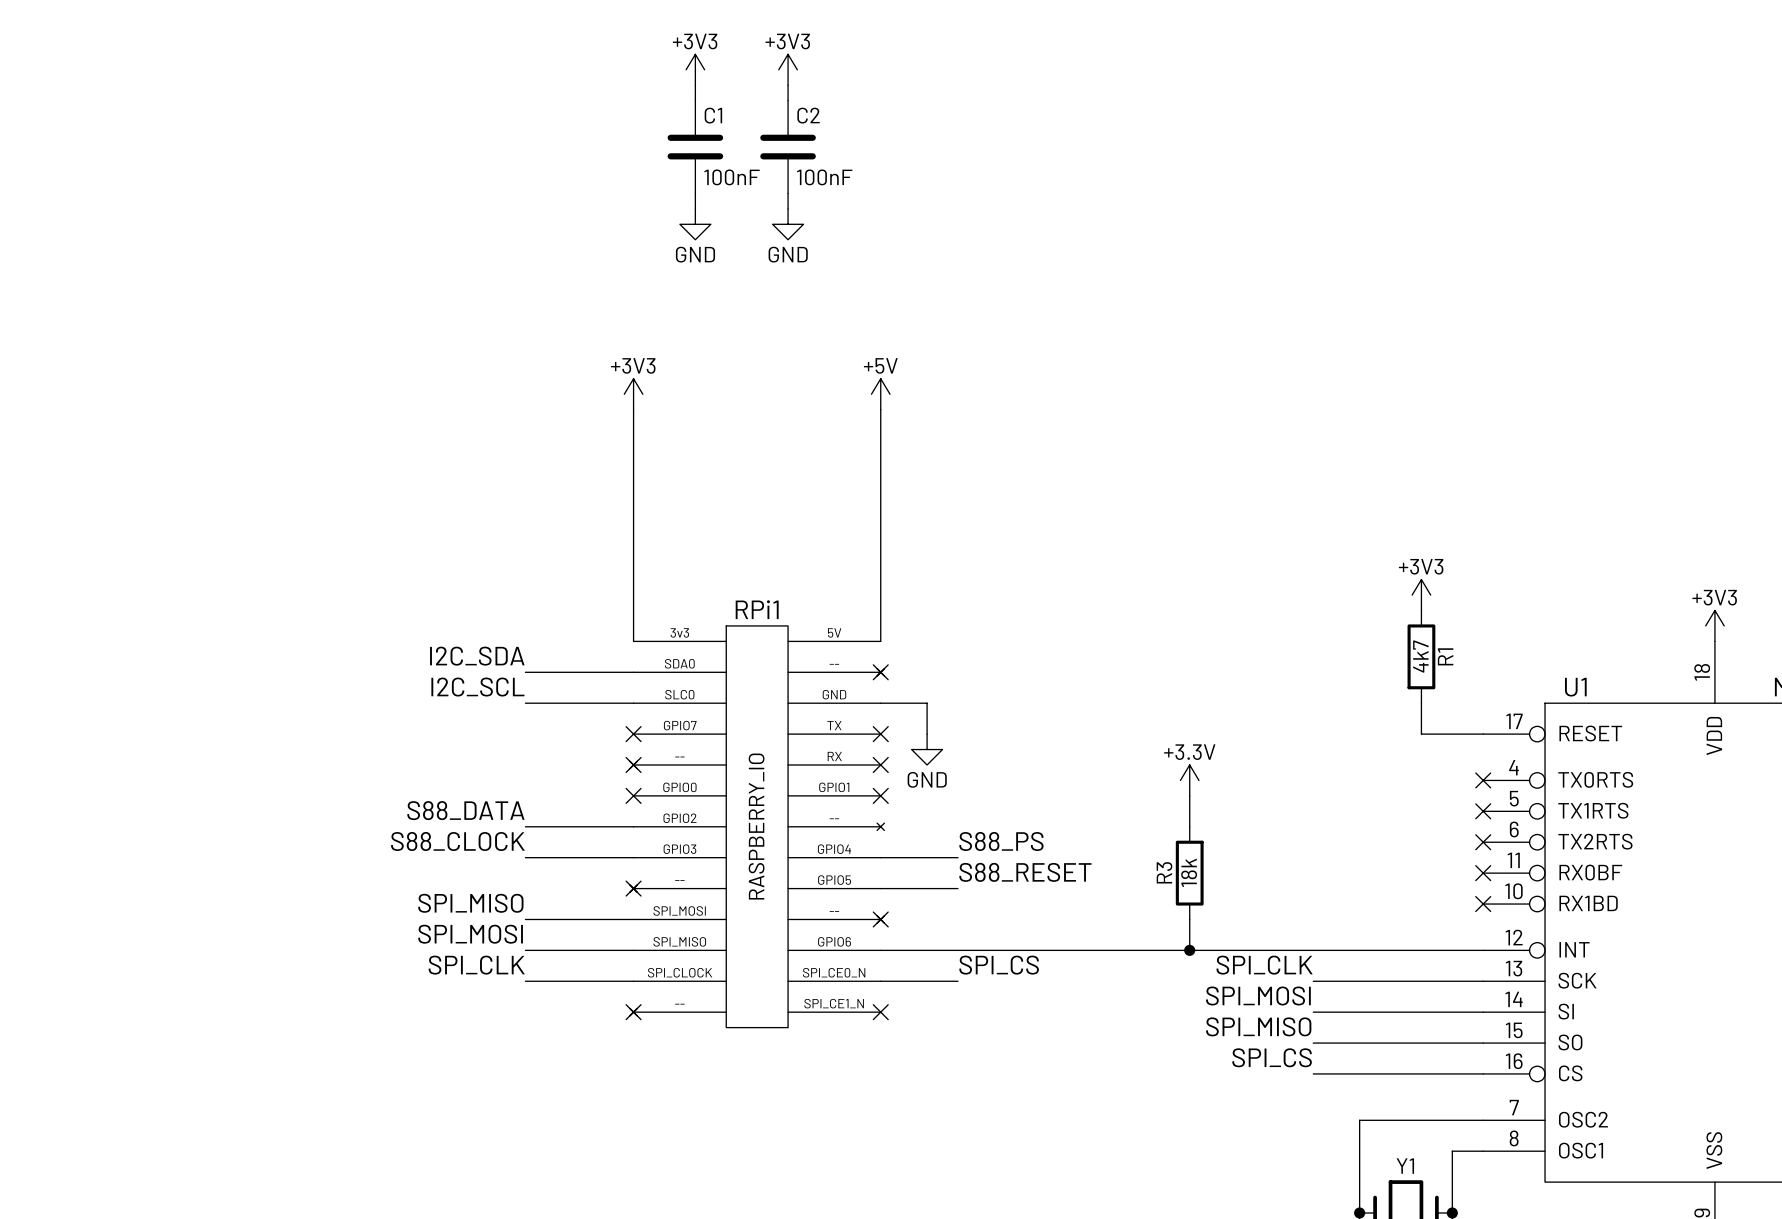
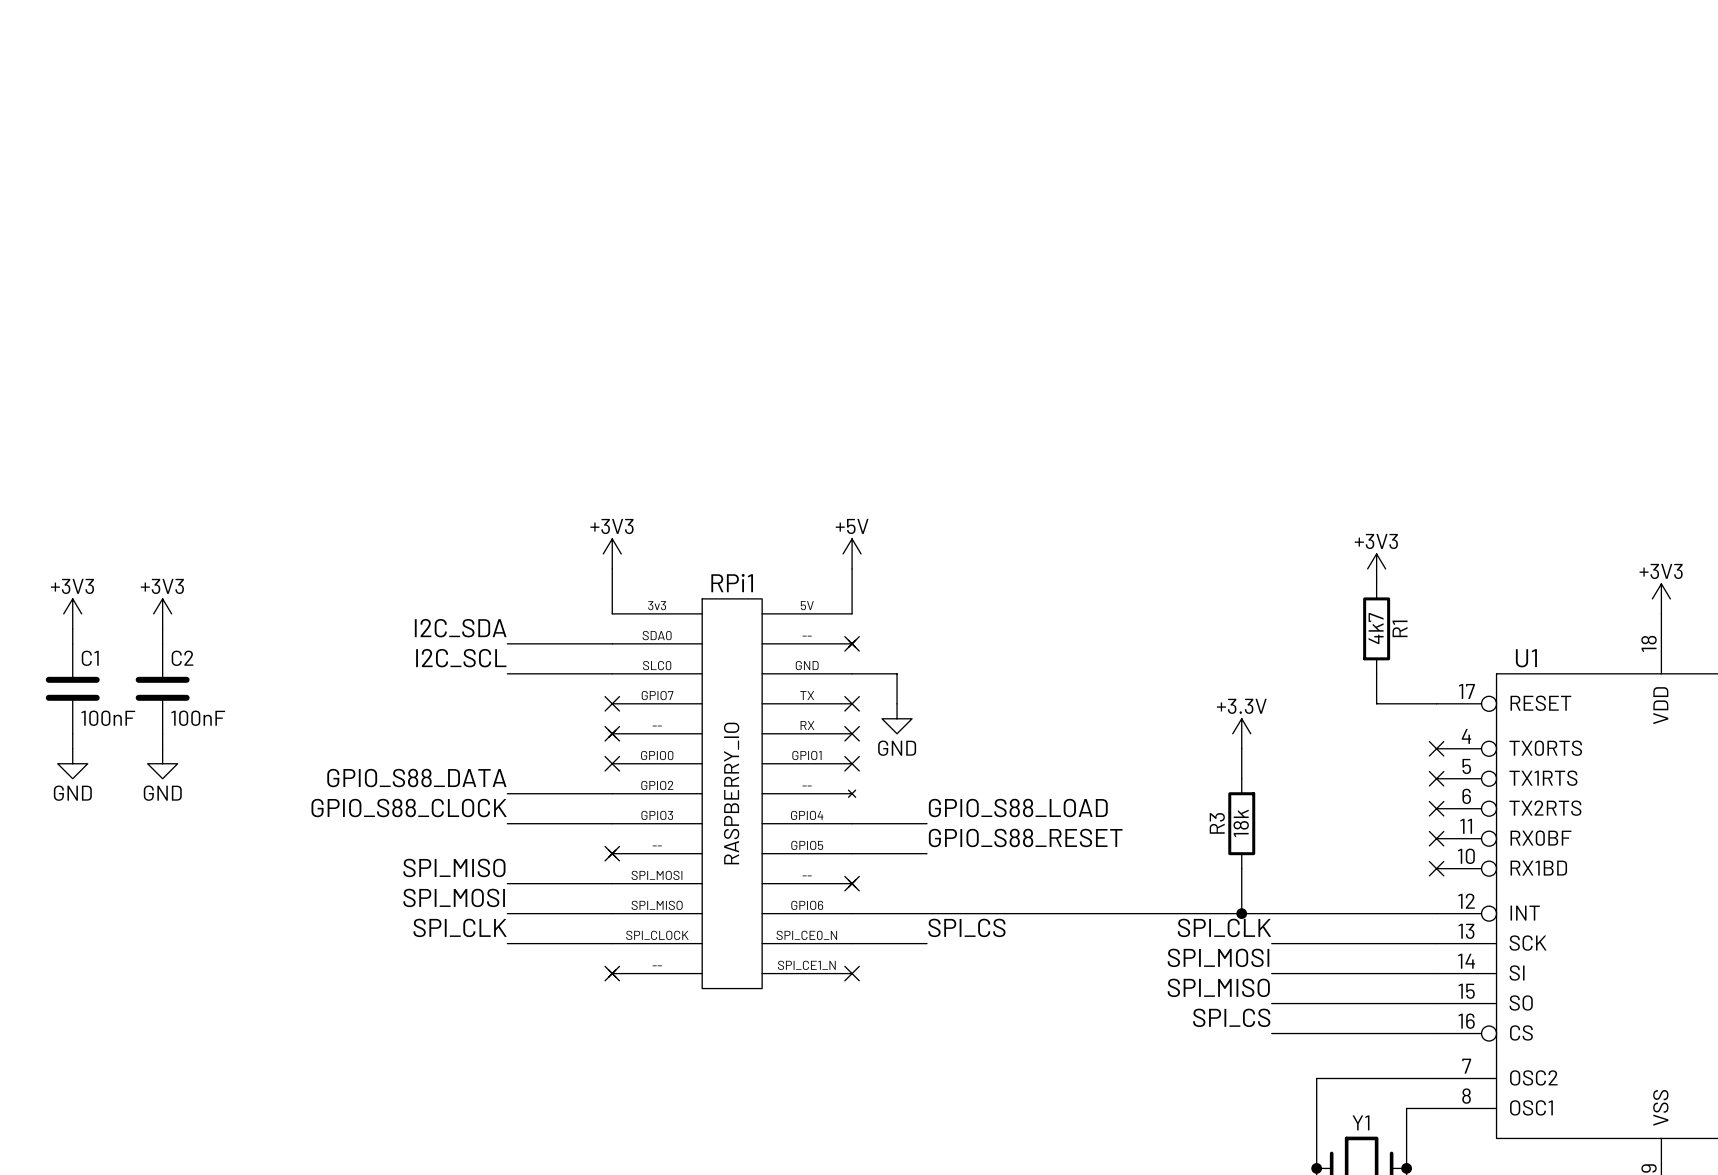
power symbol: +3V3 (695, 69) -> none
power symbol: +3V3 (788, 69) -> none
wire: (695, 85) (695, 100) -> none
wire: (788, 85) (788, 100) -> none
C1 position: (695, 147) -> (72, 688)
C2 position: (788, 147) -> (162, 688)
wire: (695, 193) (695, 208) -> none
wire: (788, 193) (788, 208) -> none
power symbol: GND (695, 224) -> none
power symbol: GND (788, 224) -> none
power symbol position: +3V3 (633, 394) -> +3V3 (612, 553)
power symbol position: +5V (880, 394) -> +5V (852, 553)
wire: (633, 409) (633, 595) -> none
wire: (880, 409) (880, 595) -> none
power symbol: none -> +3V3 (72, 613)
power symbol: none -> +3V3 (162, 613)
wire: none -> (72, 628) (72, 643)
wire: none -> (162, 628) (162, 643)
wire: none -> (72, 733) (72, 748)
wire: none -> (162, 733) (162, 748)
power symbol position: +3.3V (1189, 780) -> +3.3V (1241, 733)
power symbol: none -> GND (72, 763)
power symbol: none -> GND (162, 763)
wire: (1189, 795) (1189, 826) -> (1241, 748) (1241, 778)
label: S88_DATA (465, 810) -> GPIO_S88_DATA (416, 778)
label: S88_CLOCK (457, 841) -> GPIO_S88_CLOCK (409, 808)
label: S88_PS (1001, 841) -> GPIO_S88_LOAD (1018, 807)
label: S88_RESET (1025, 872) -> GPIO_S88_RESET (1025, 837)
R3 position: (1189, 873) -> (1241, 823)
wire: none -> (1241, 868) (1241, 913)
wire: (1189, 919) (1189, 950) -> none
junction: (1189, 950) -> none
junction: none -> (1241, 913)

